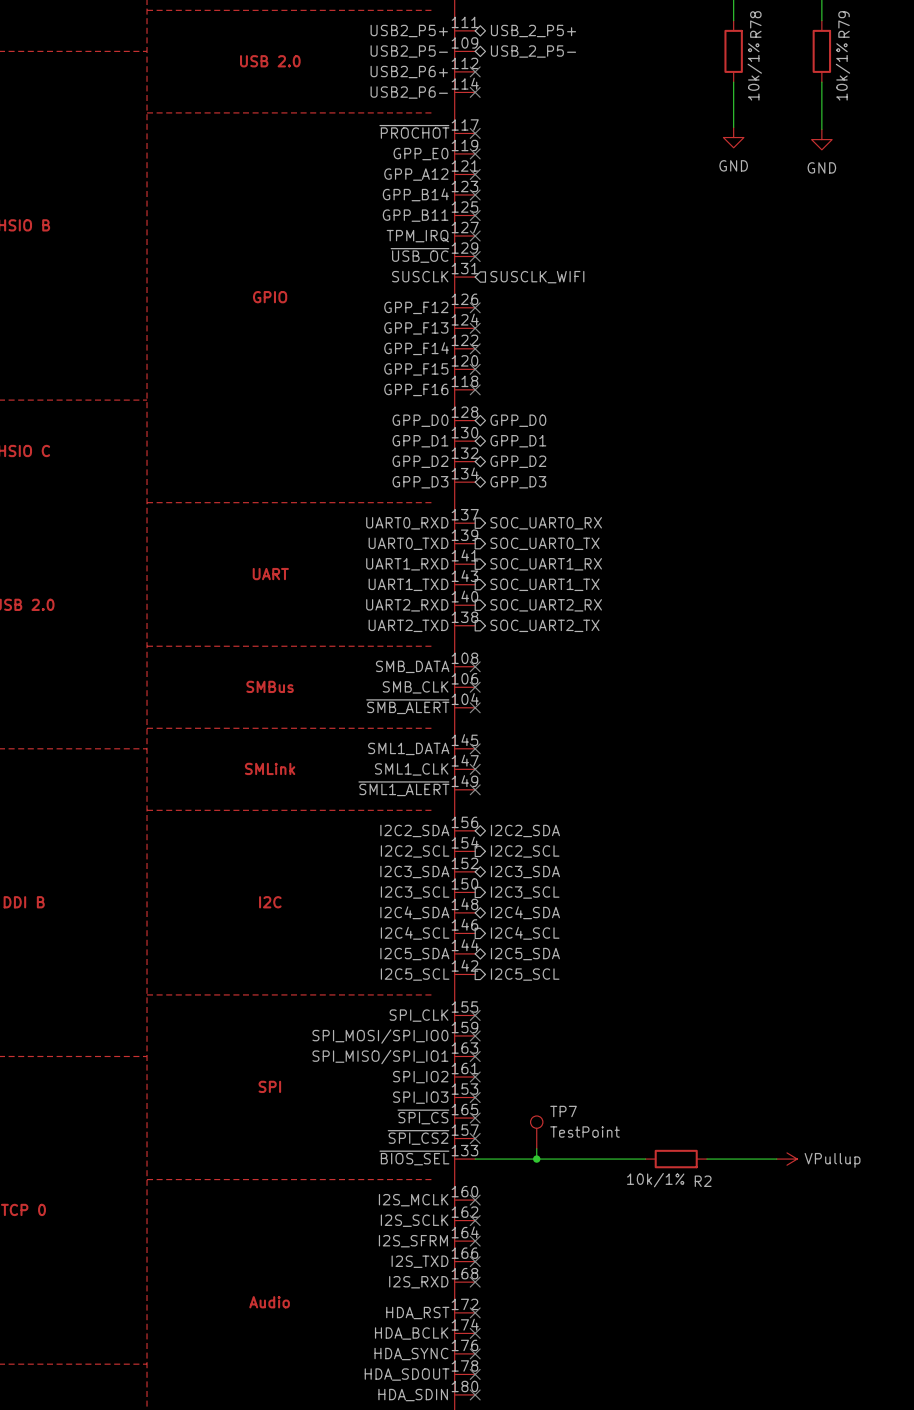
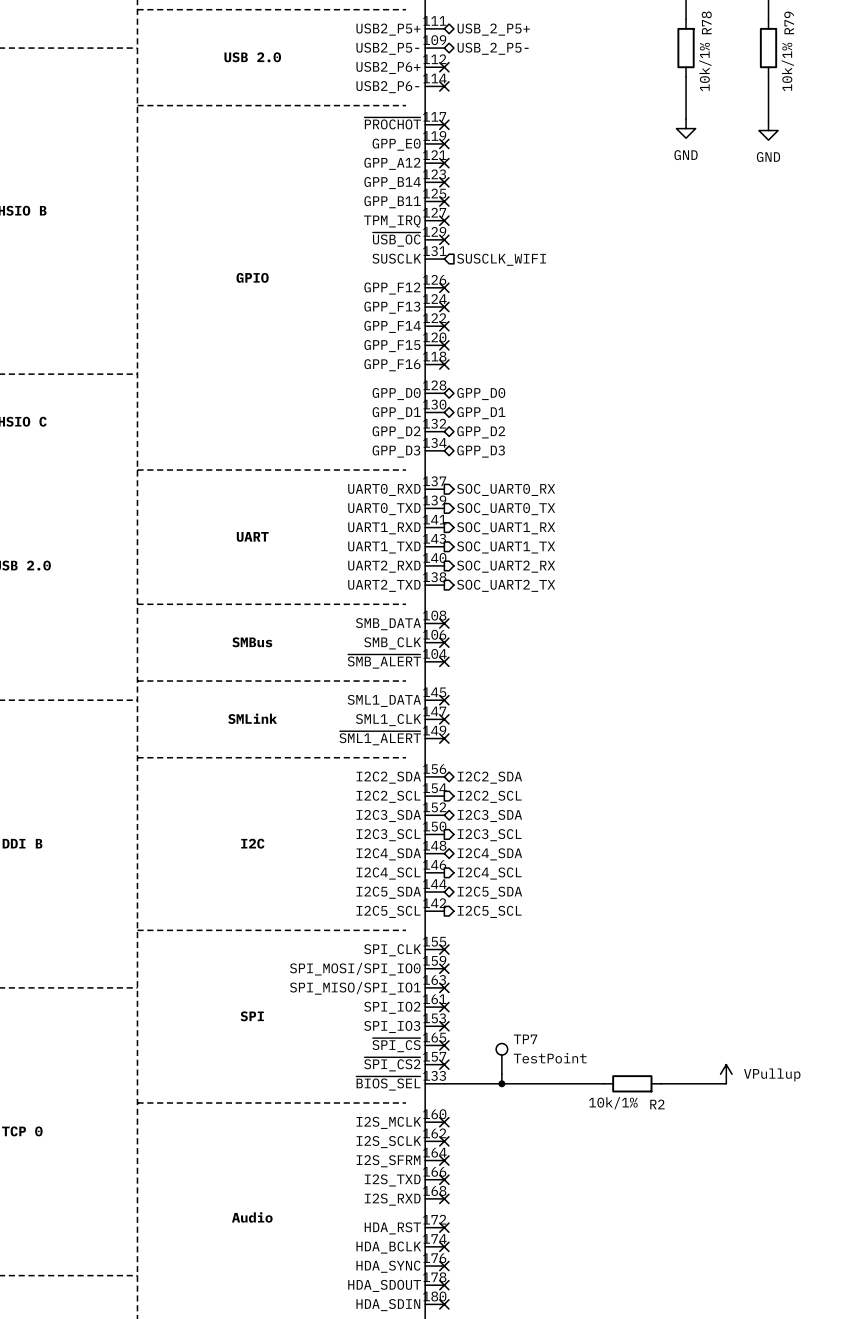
power symbol rotation: 0° (786, 1159) -> 90° counterclockwise (726, 1074)
power symbol position: VPullup (786, 1159) -> VPullup (726, 1074)

